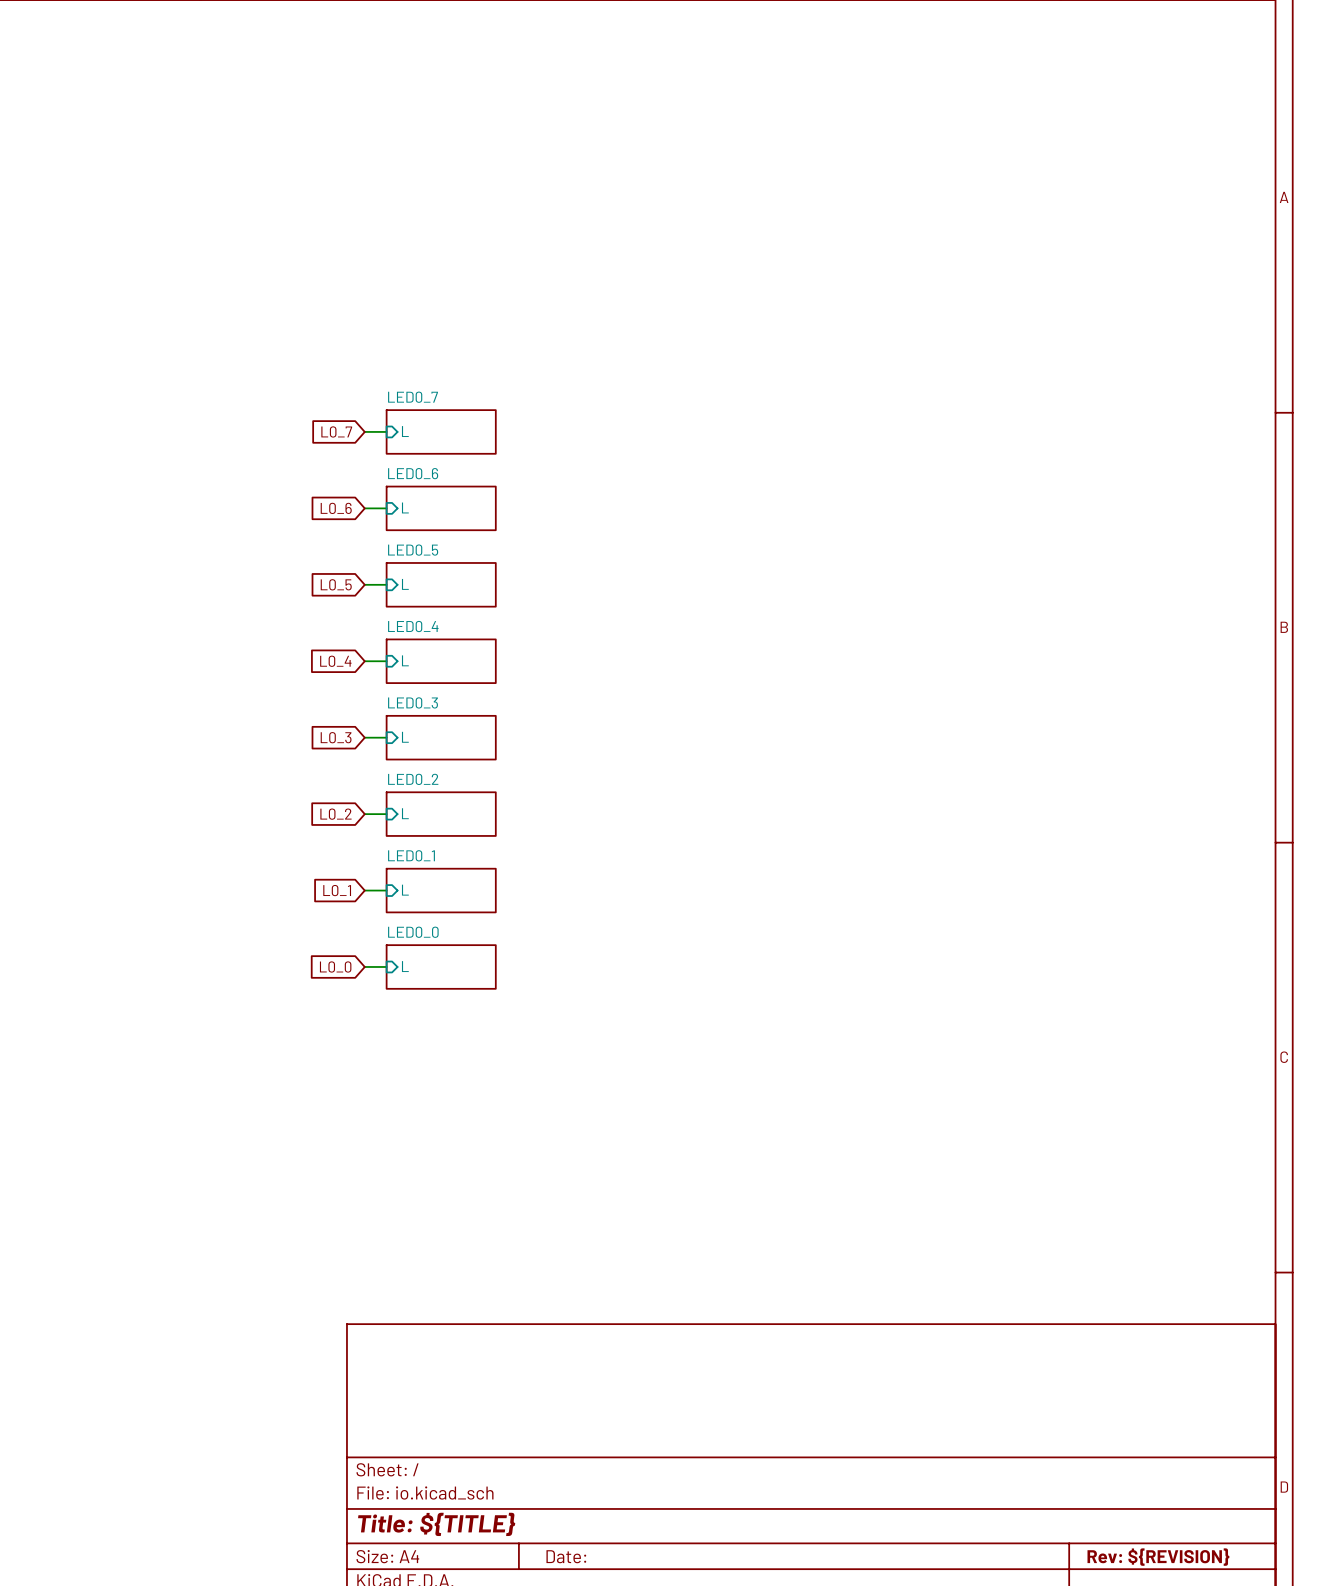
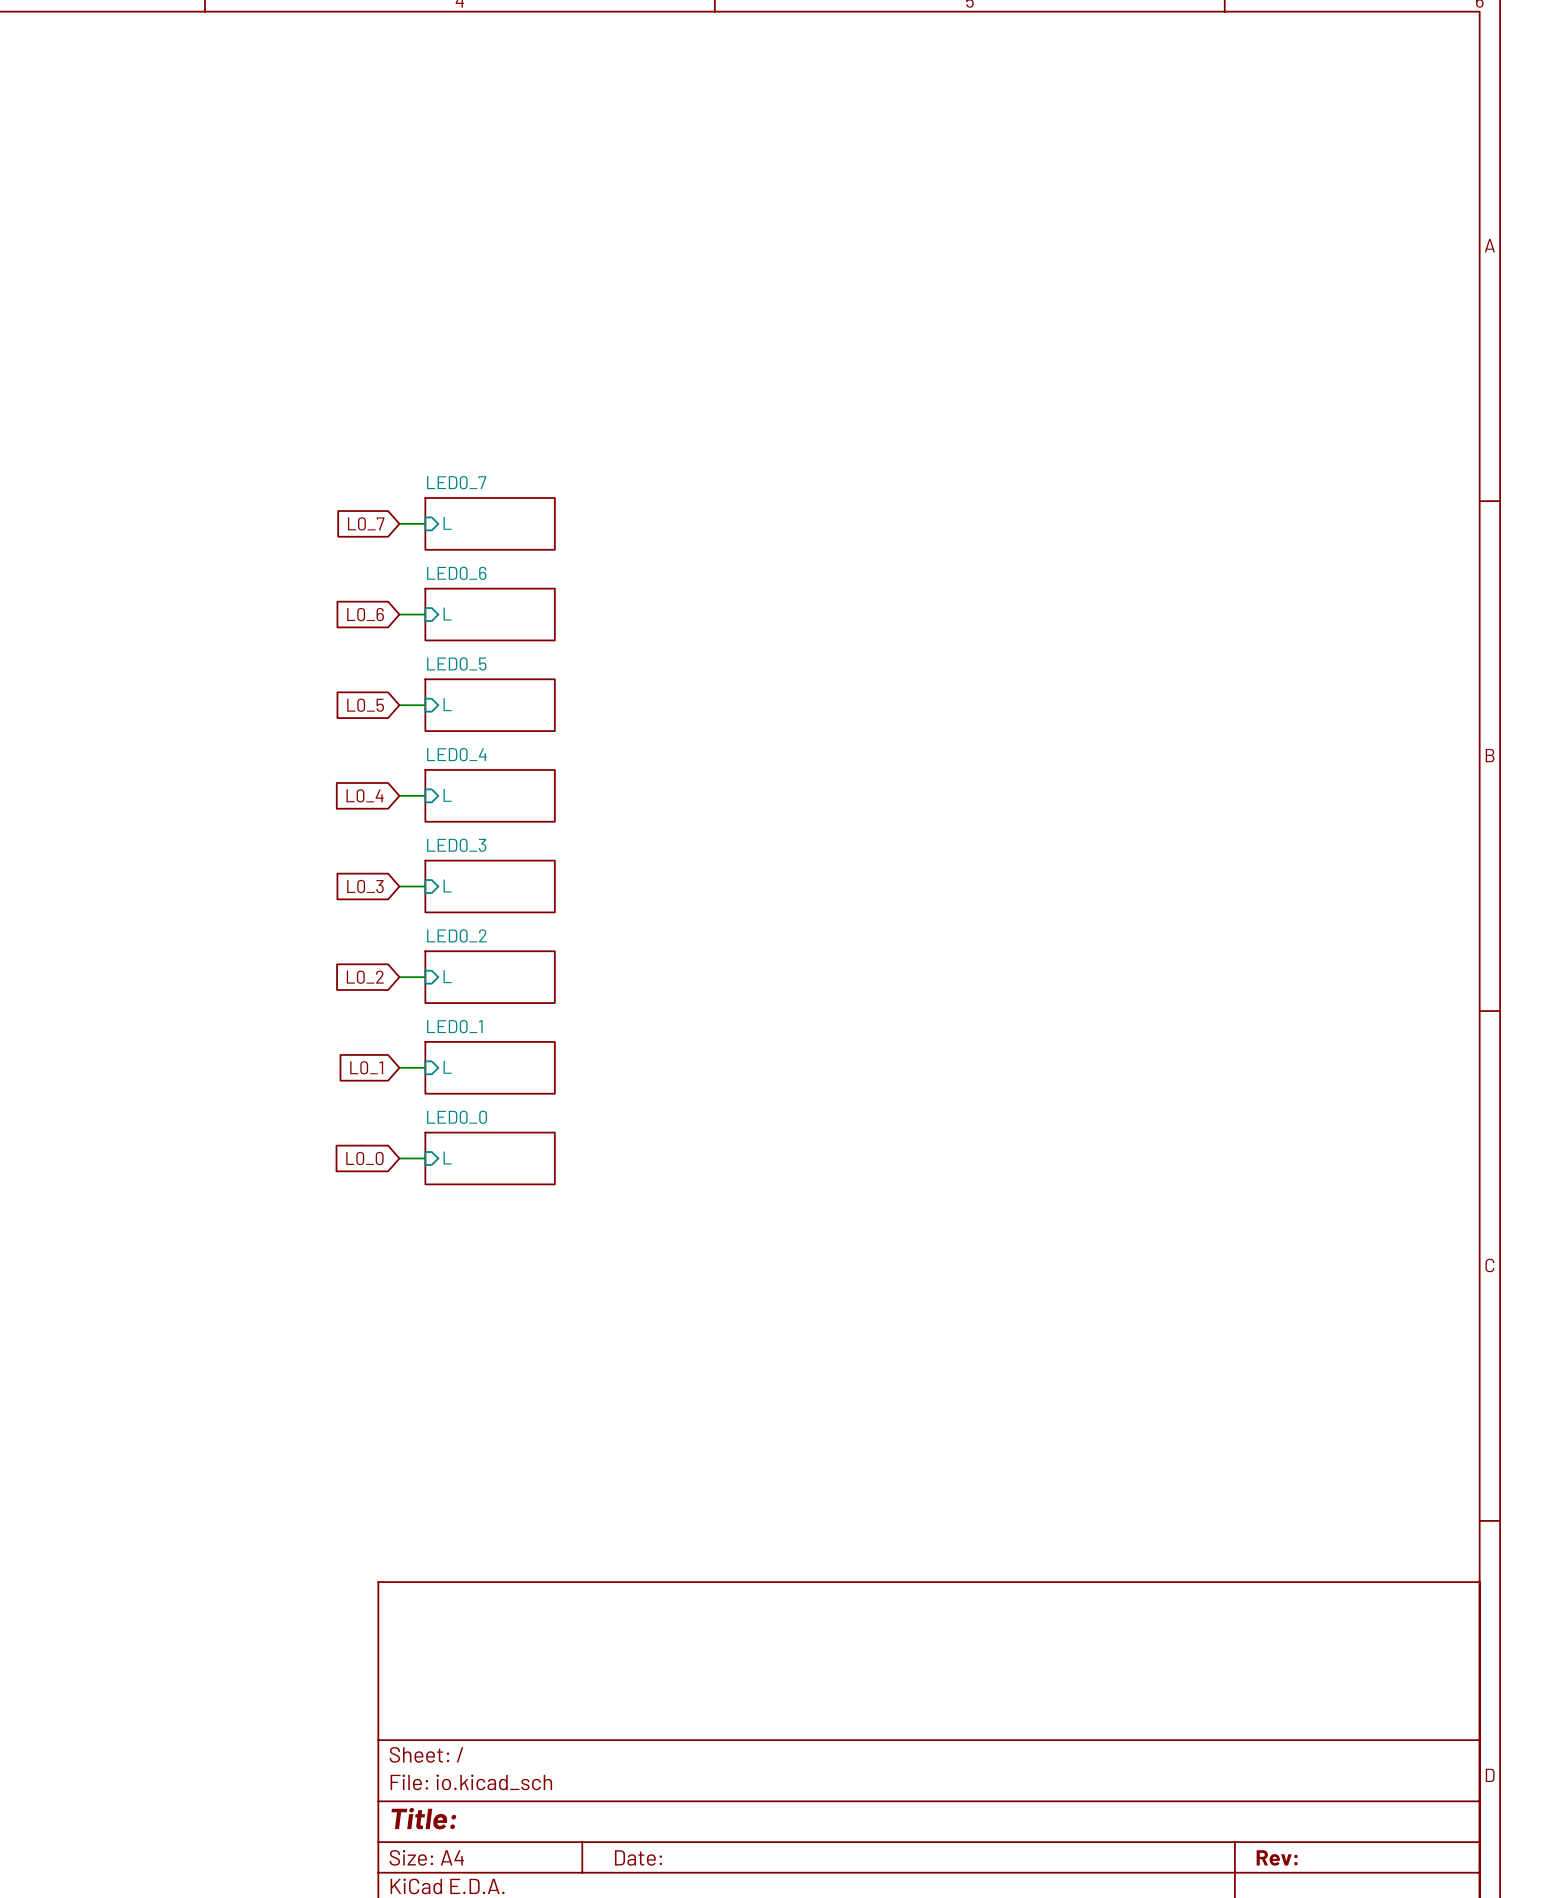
title block: Title: ${TITLE} (436, 1524) -> Title: (423, 1818)
title block: Rev: ${REVISION} (1158, 1557) -> Rev: (1277, 1857)

